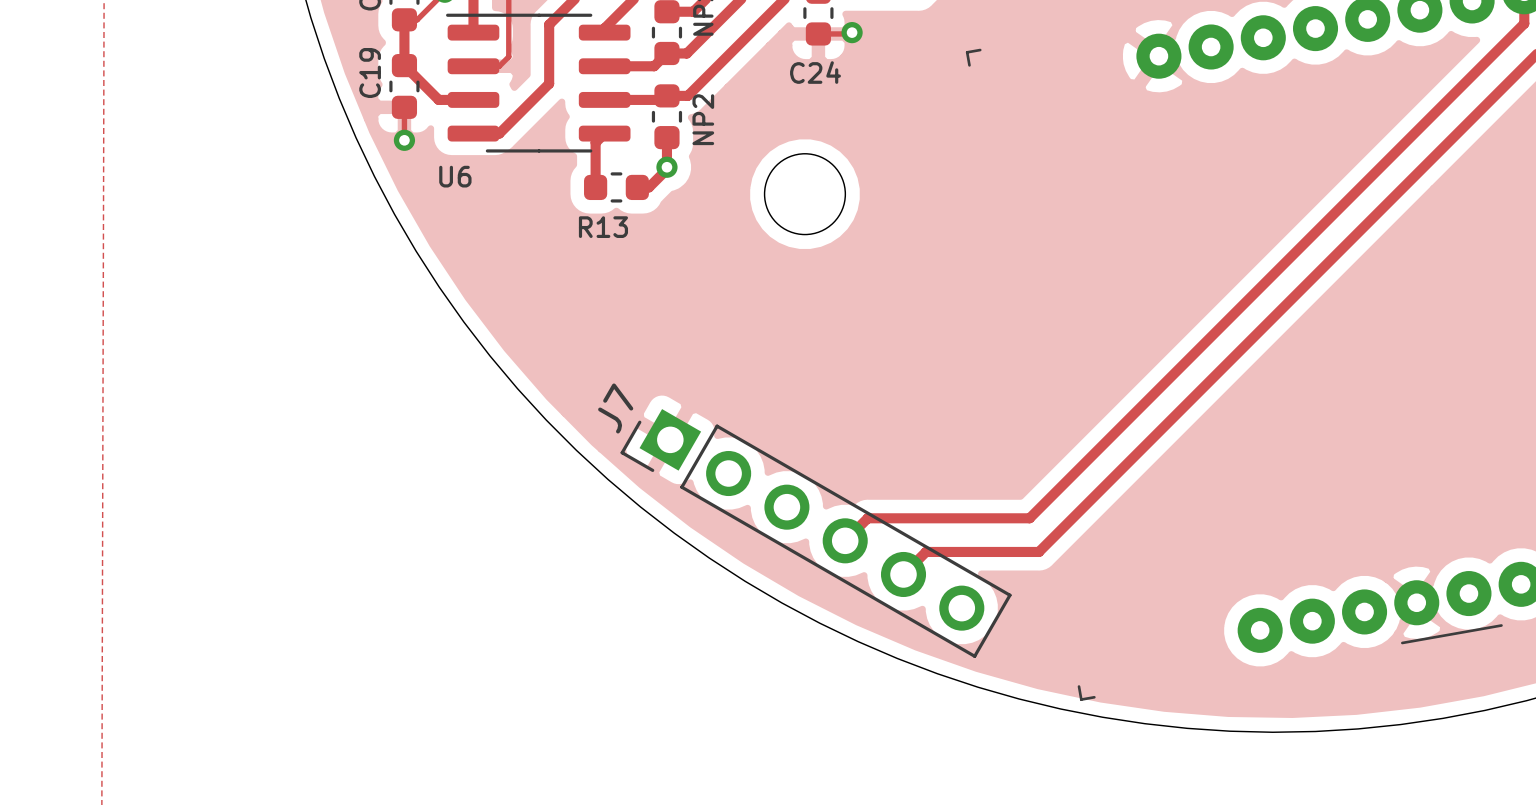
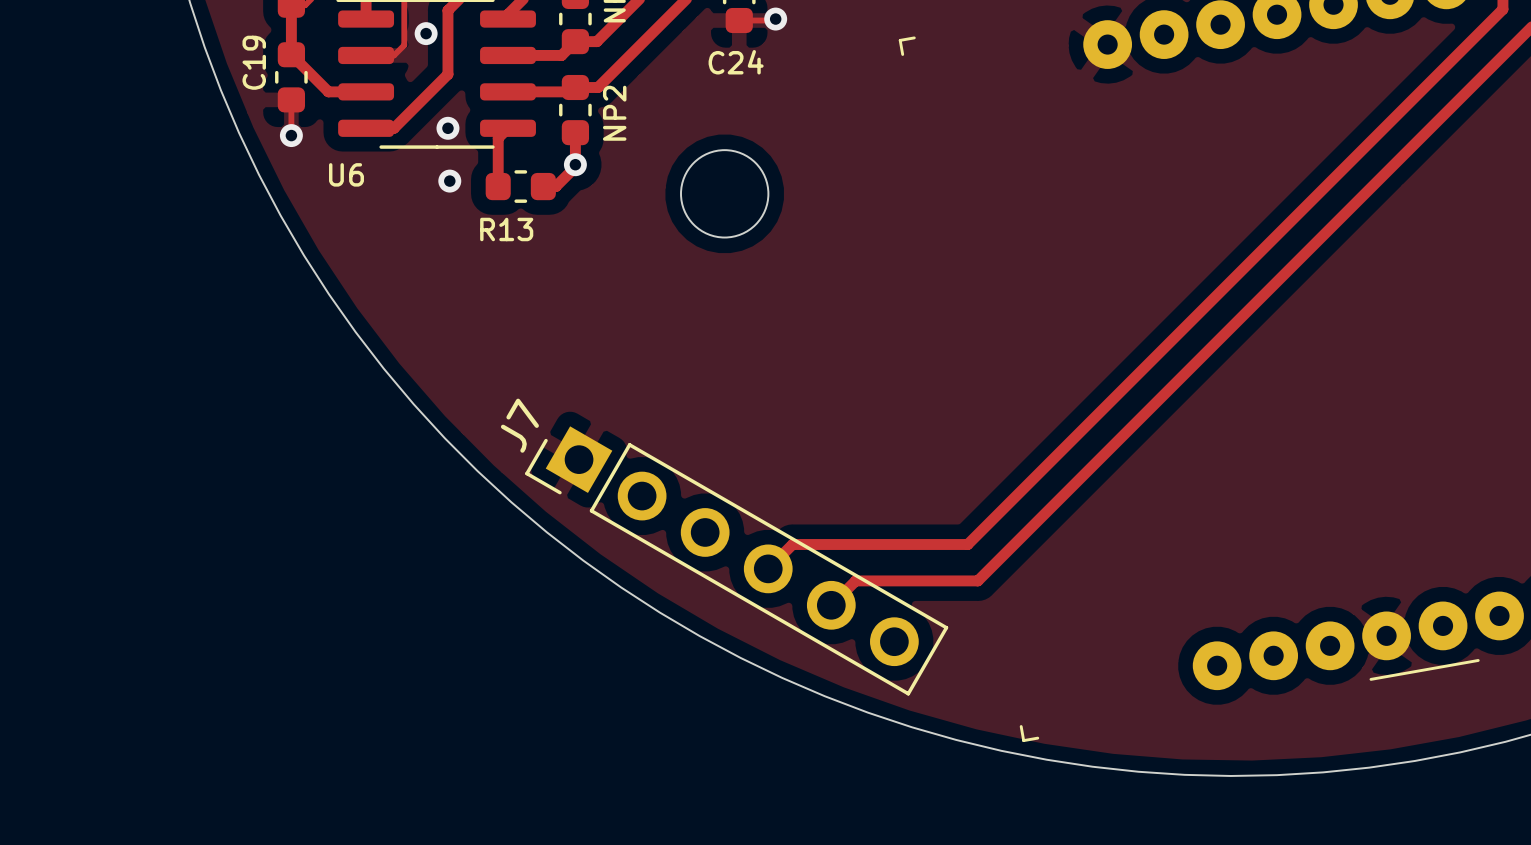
via: none -> (426, 33)
via: none -> (447, 128)
via: none -> (449, 181)

